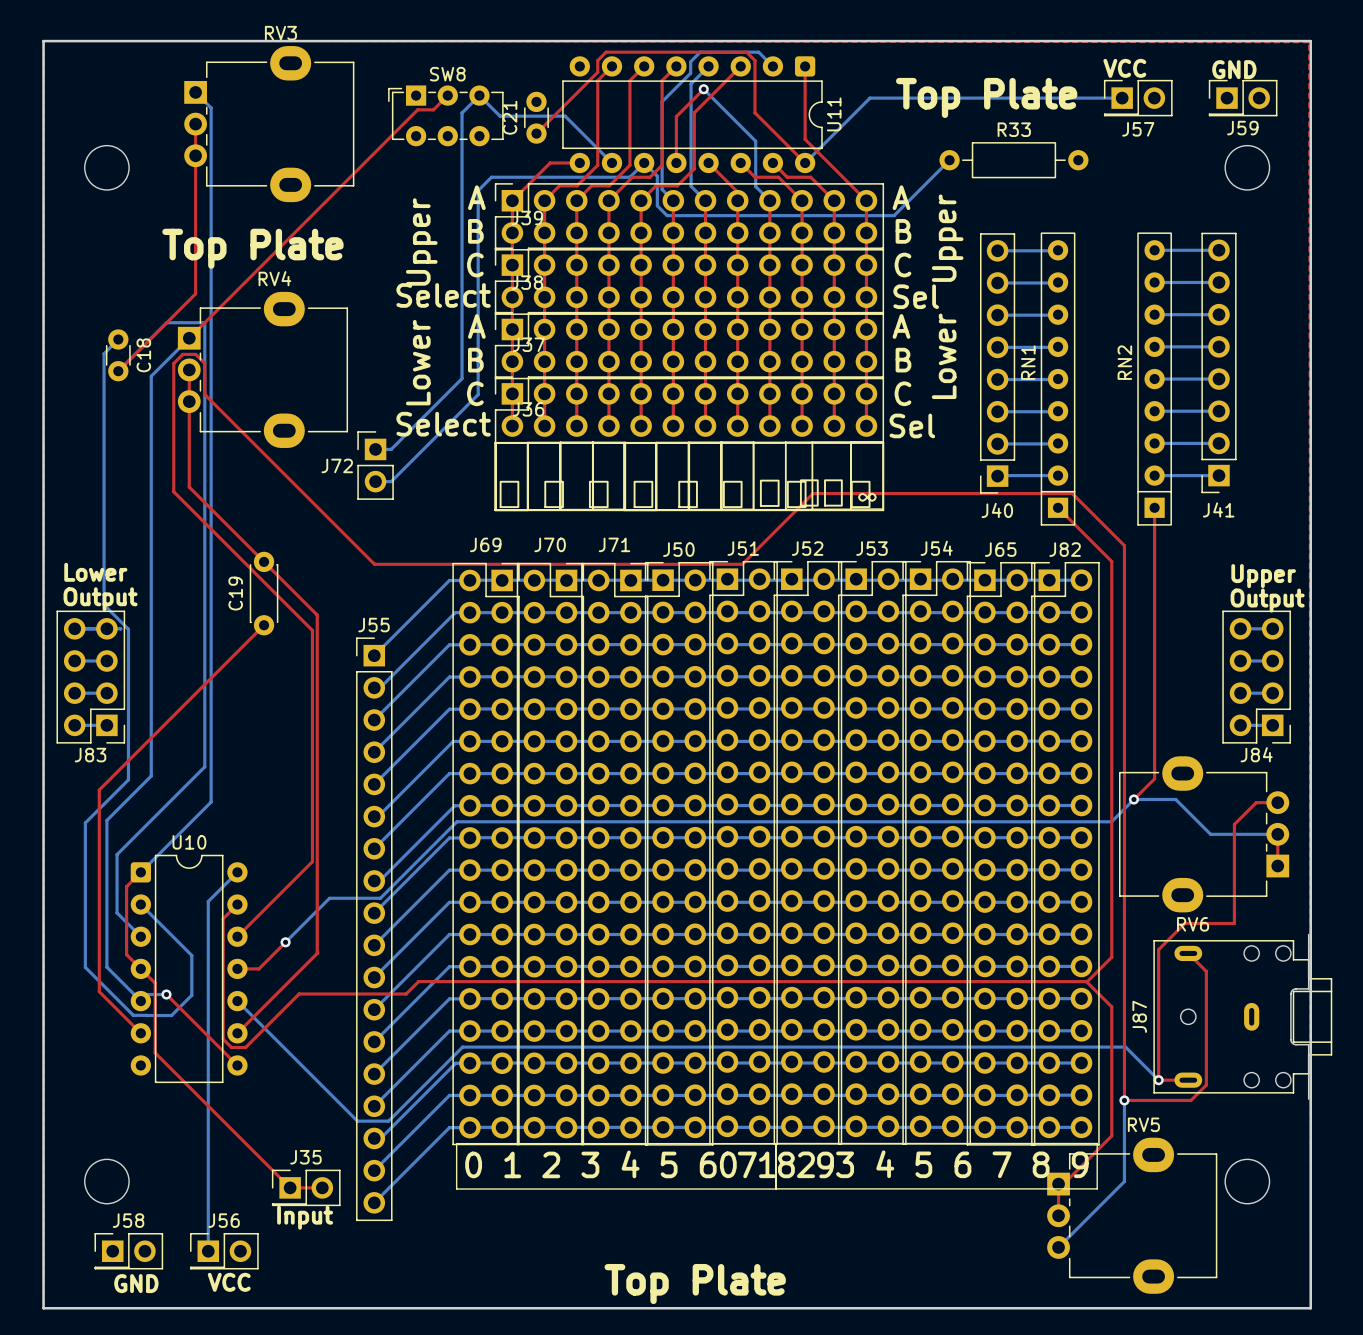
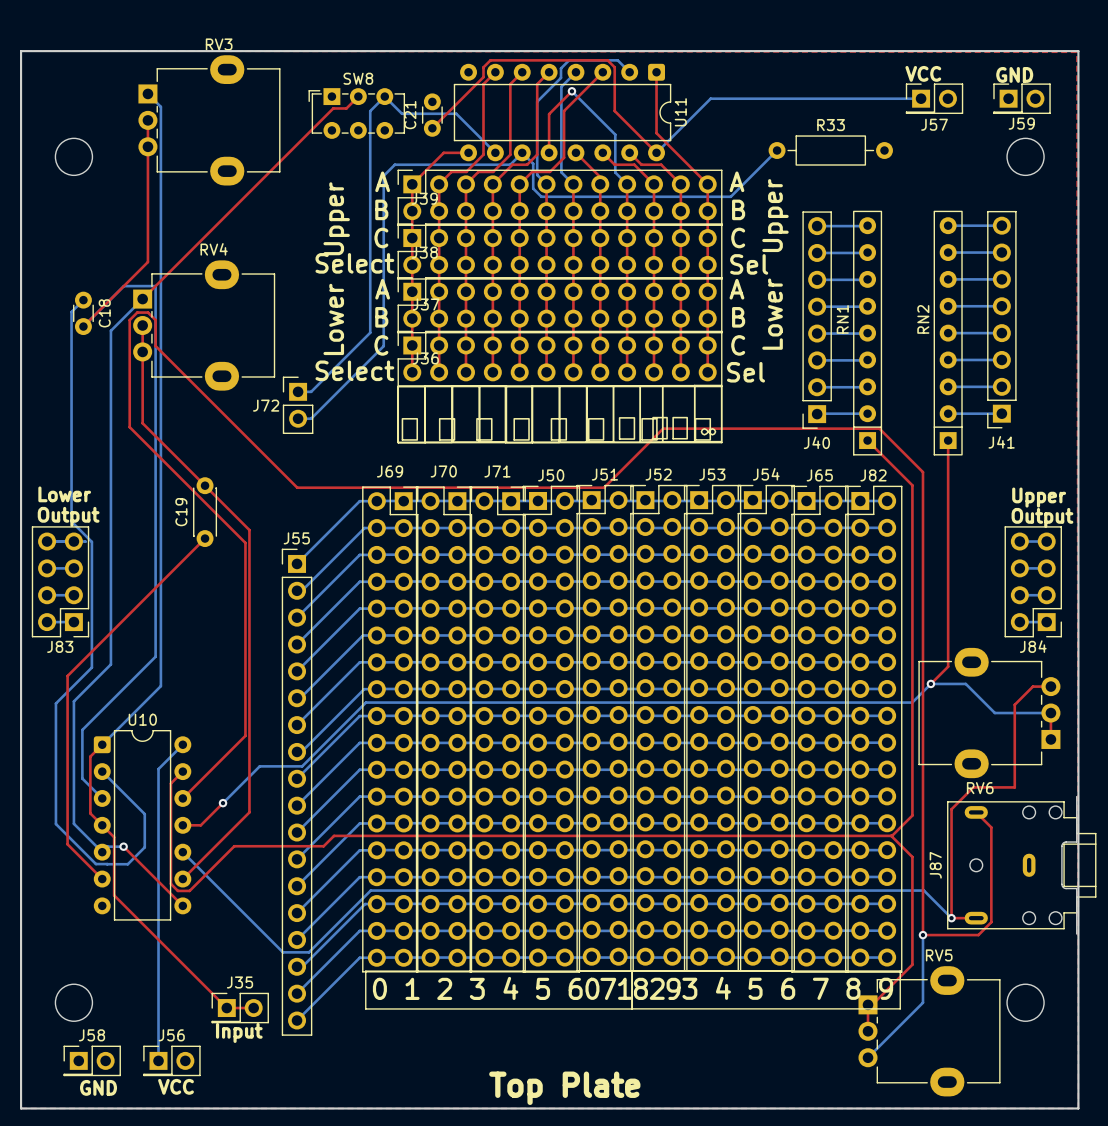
text: Top Plate (986, 97) -> none
text: Top Plate (252, 248) -> none

